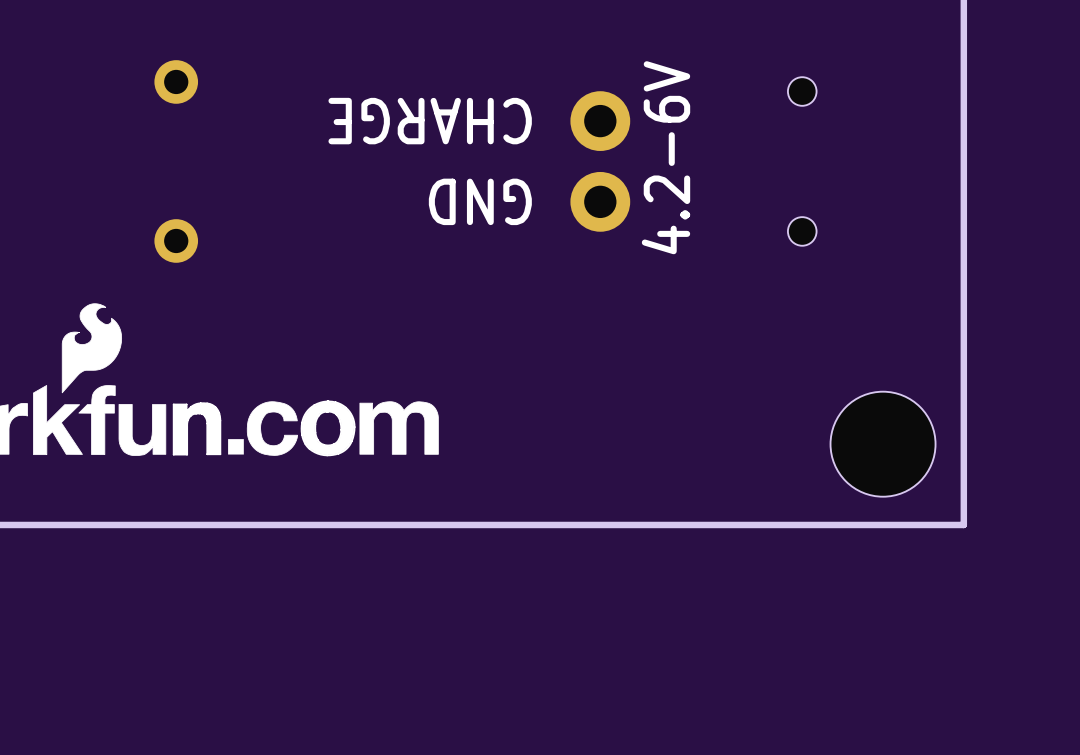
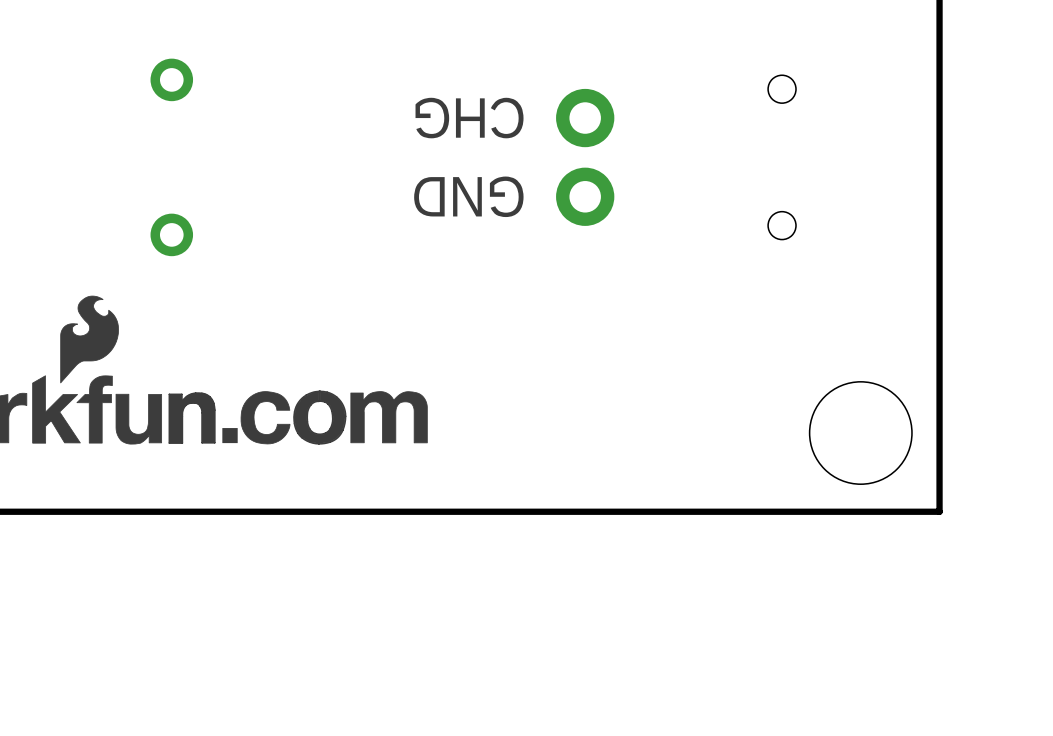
text: CHARGE (430, 121) -> CHG (469, 118)
text: 4.2-6V (665, 157) -> none

